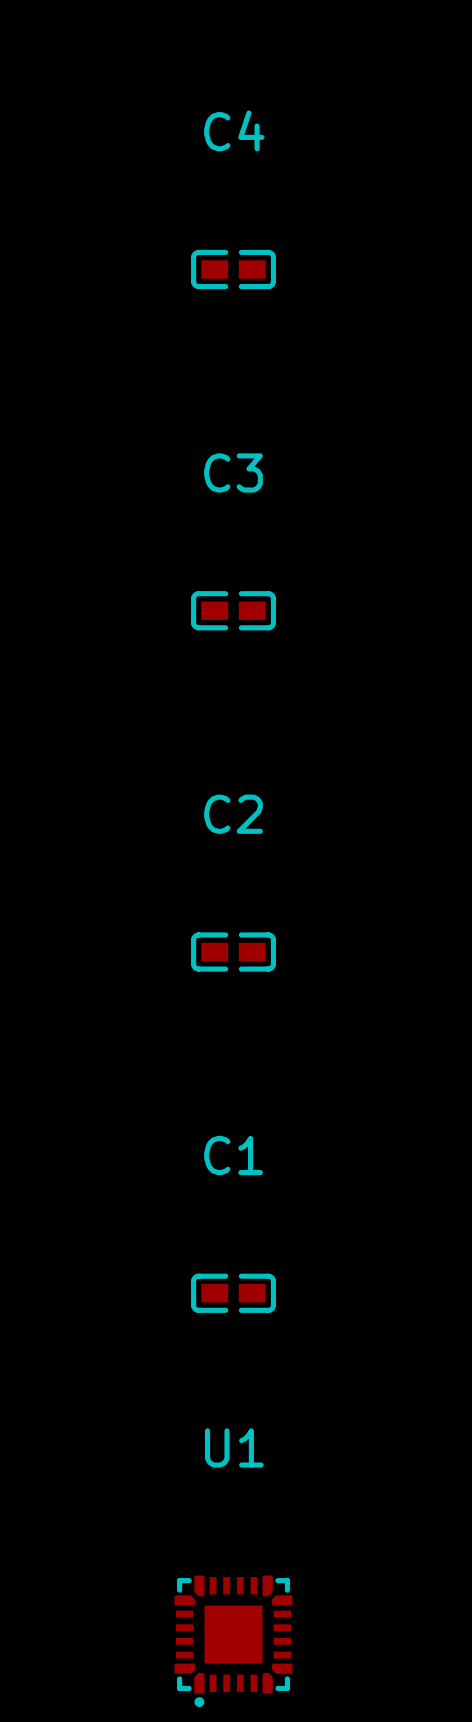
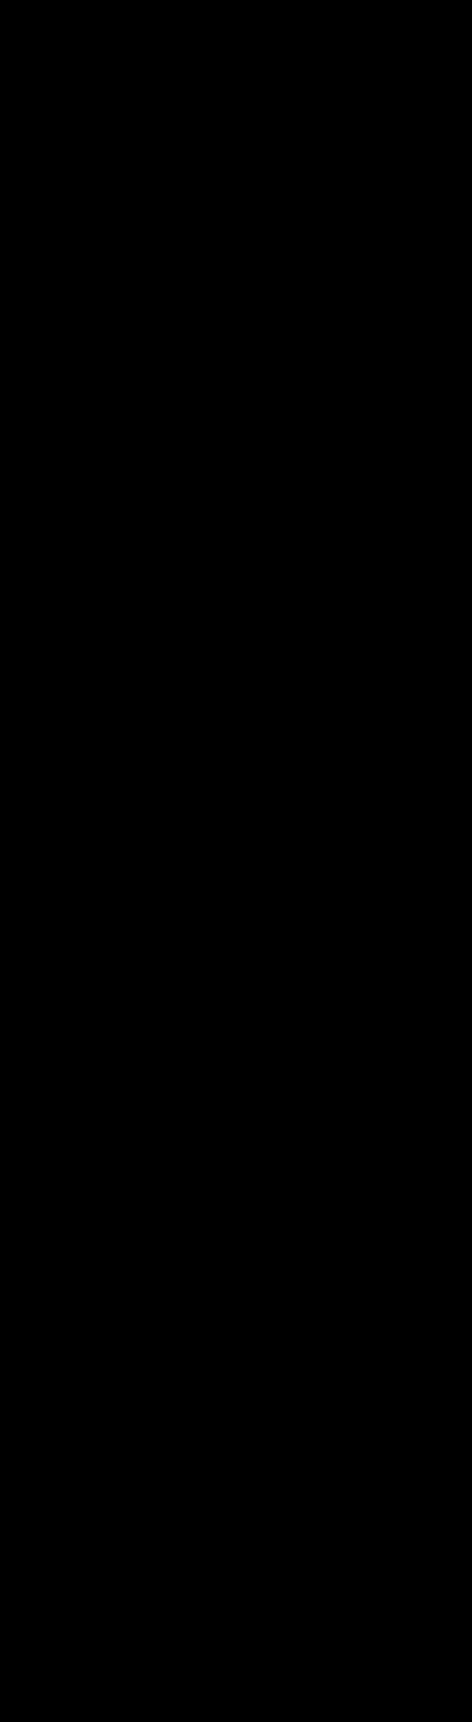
C4: (233, 269) -> none
C3: (233, 610) -> none
C2: (233, 952) -> none
C1: (233, 1293) -> none
U1: (233, 1641) -> none

